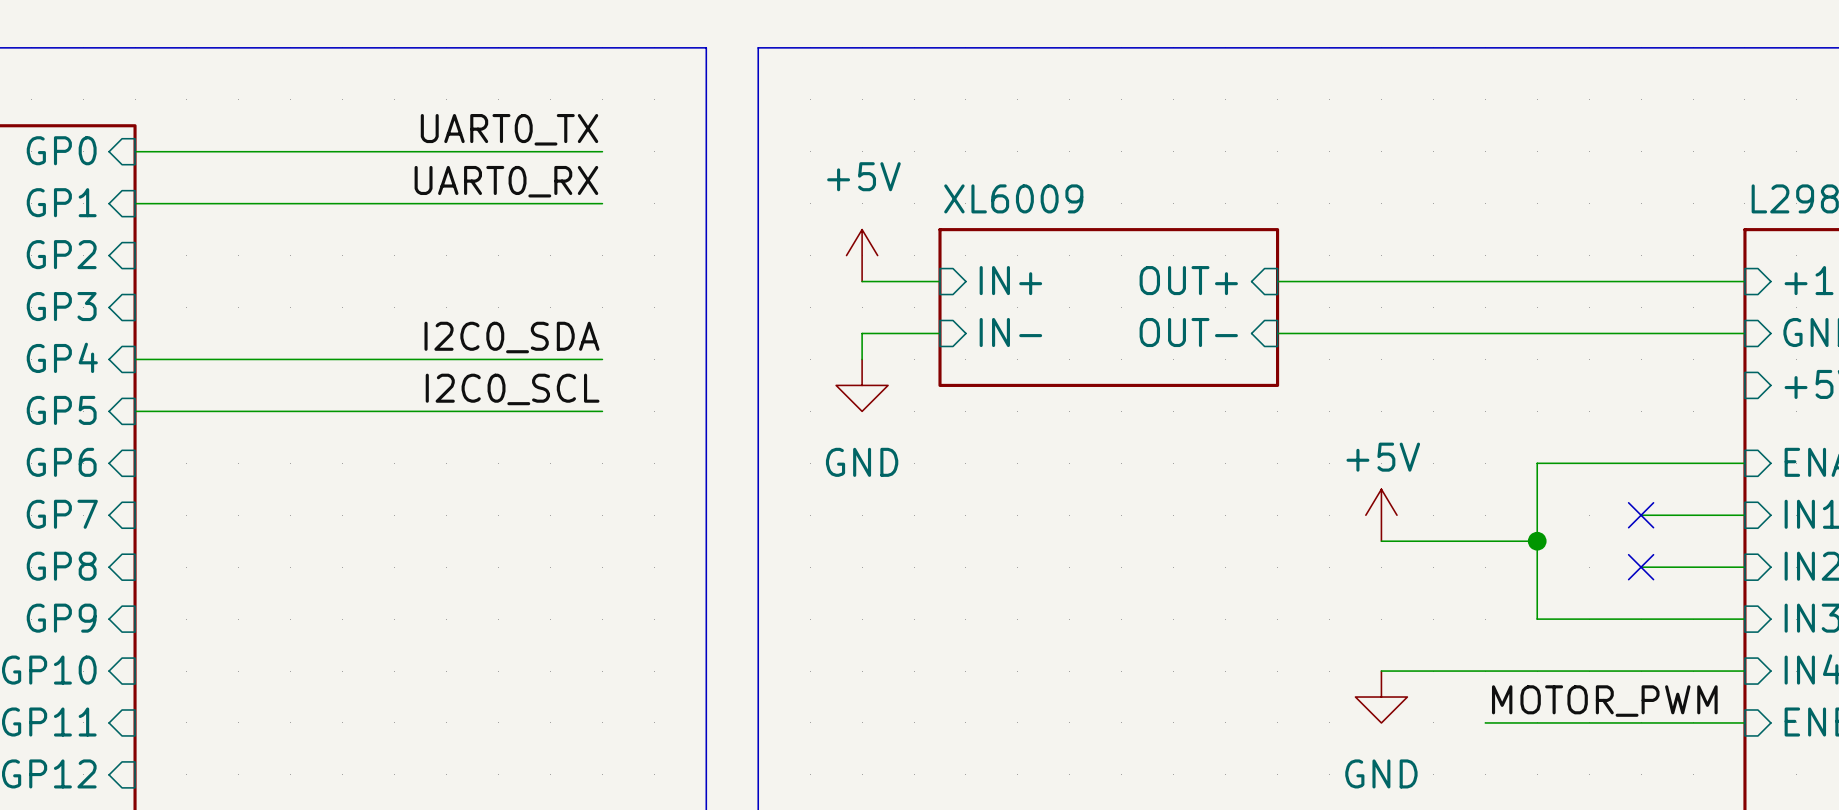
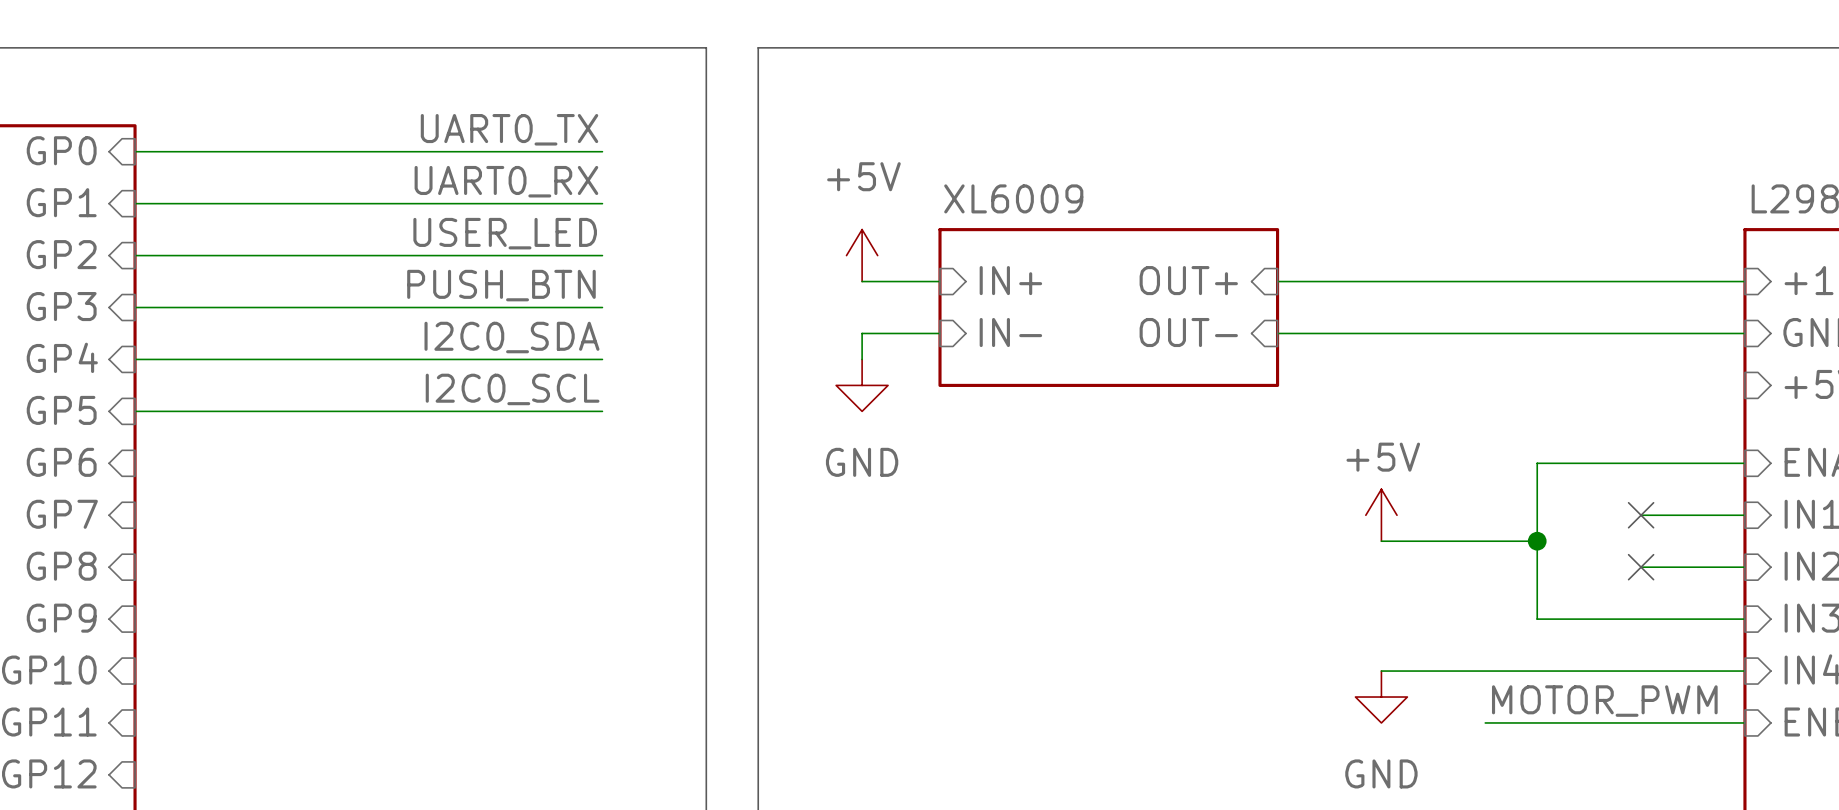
label: none -> USER_LED (505, 233)
wire: none -> (135, 255) (602, 255)
label: none -> PUSH_BTN (501, 285)
wire: none -> (135, 307) (602, 307)

